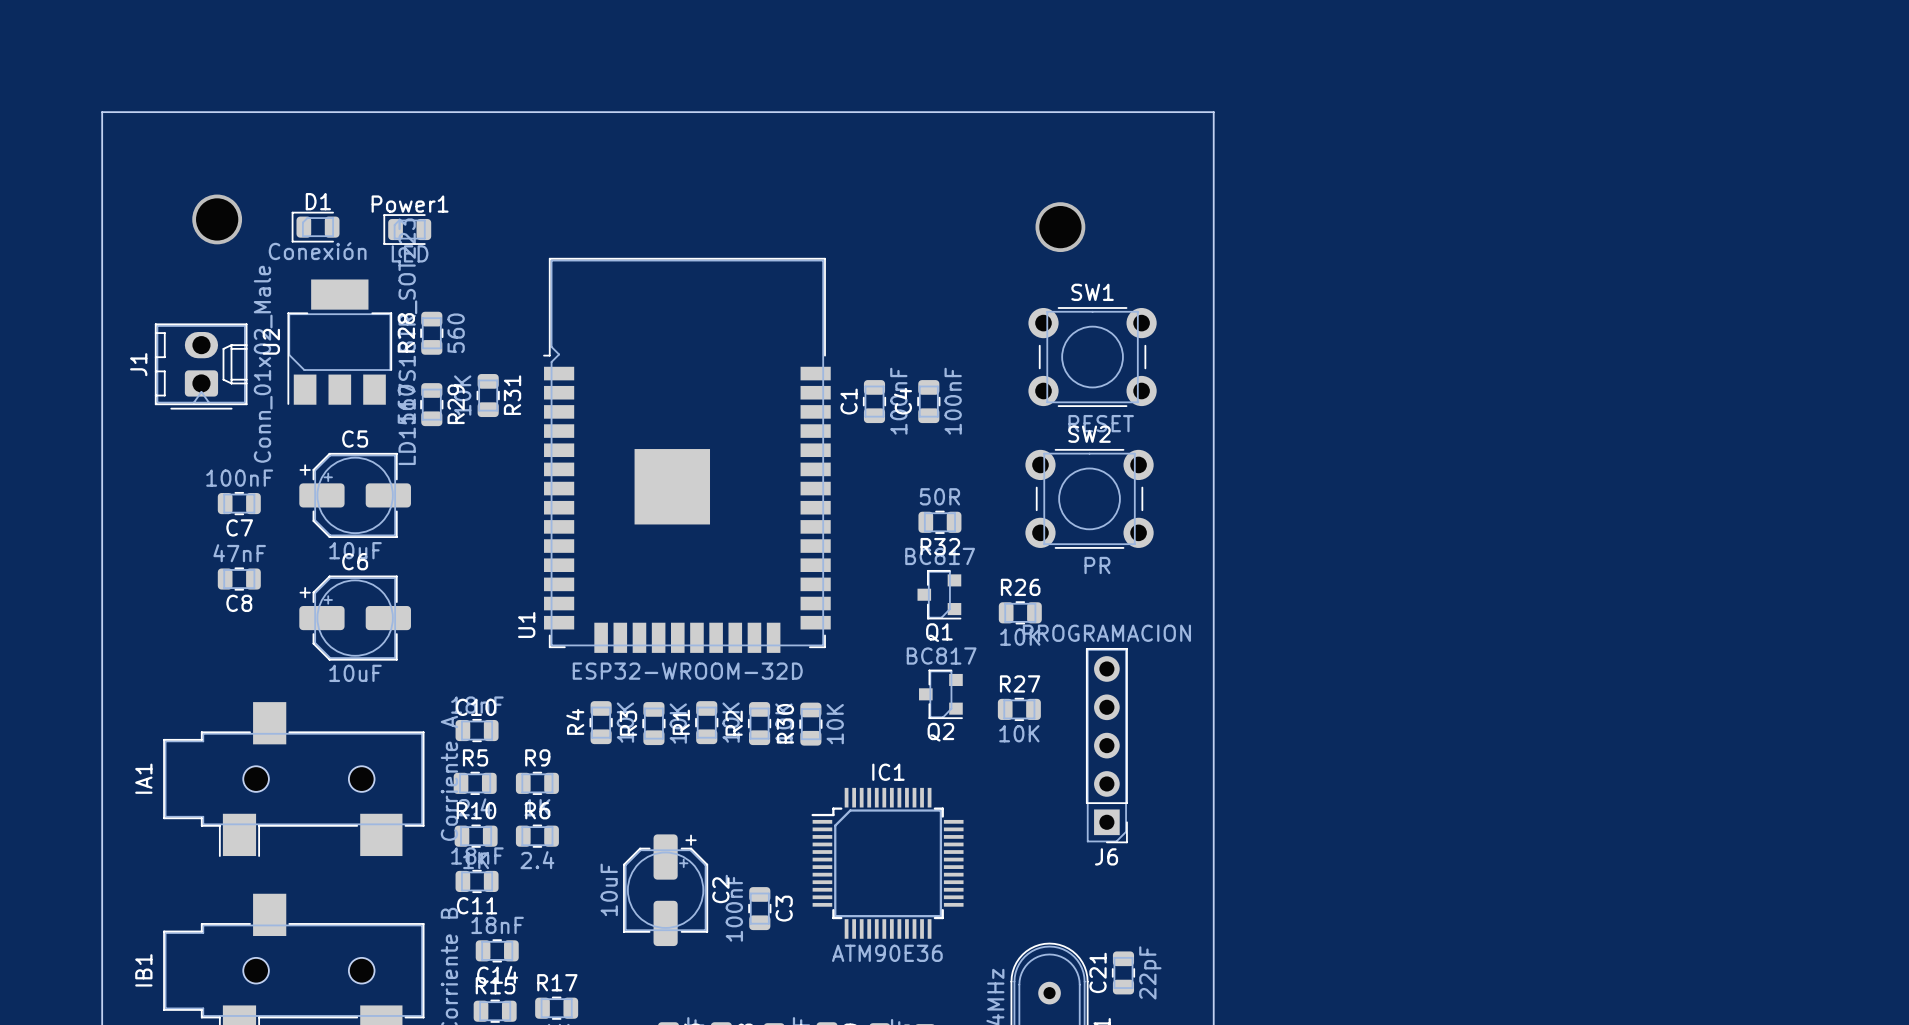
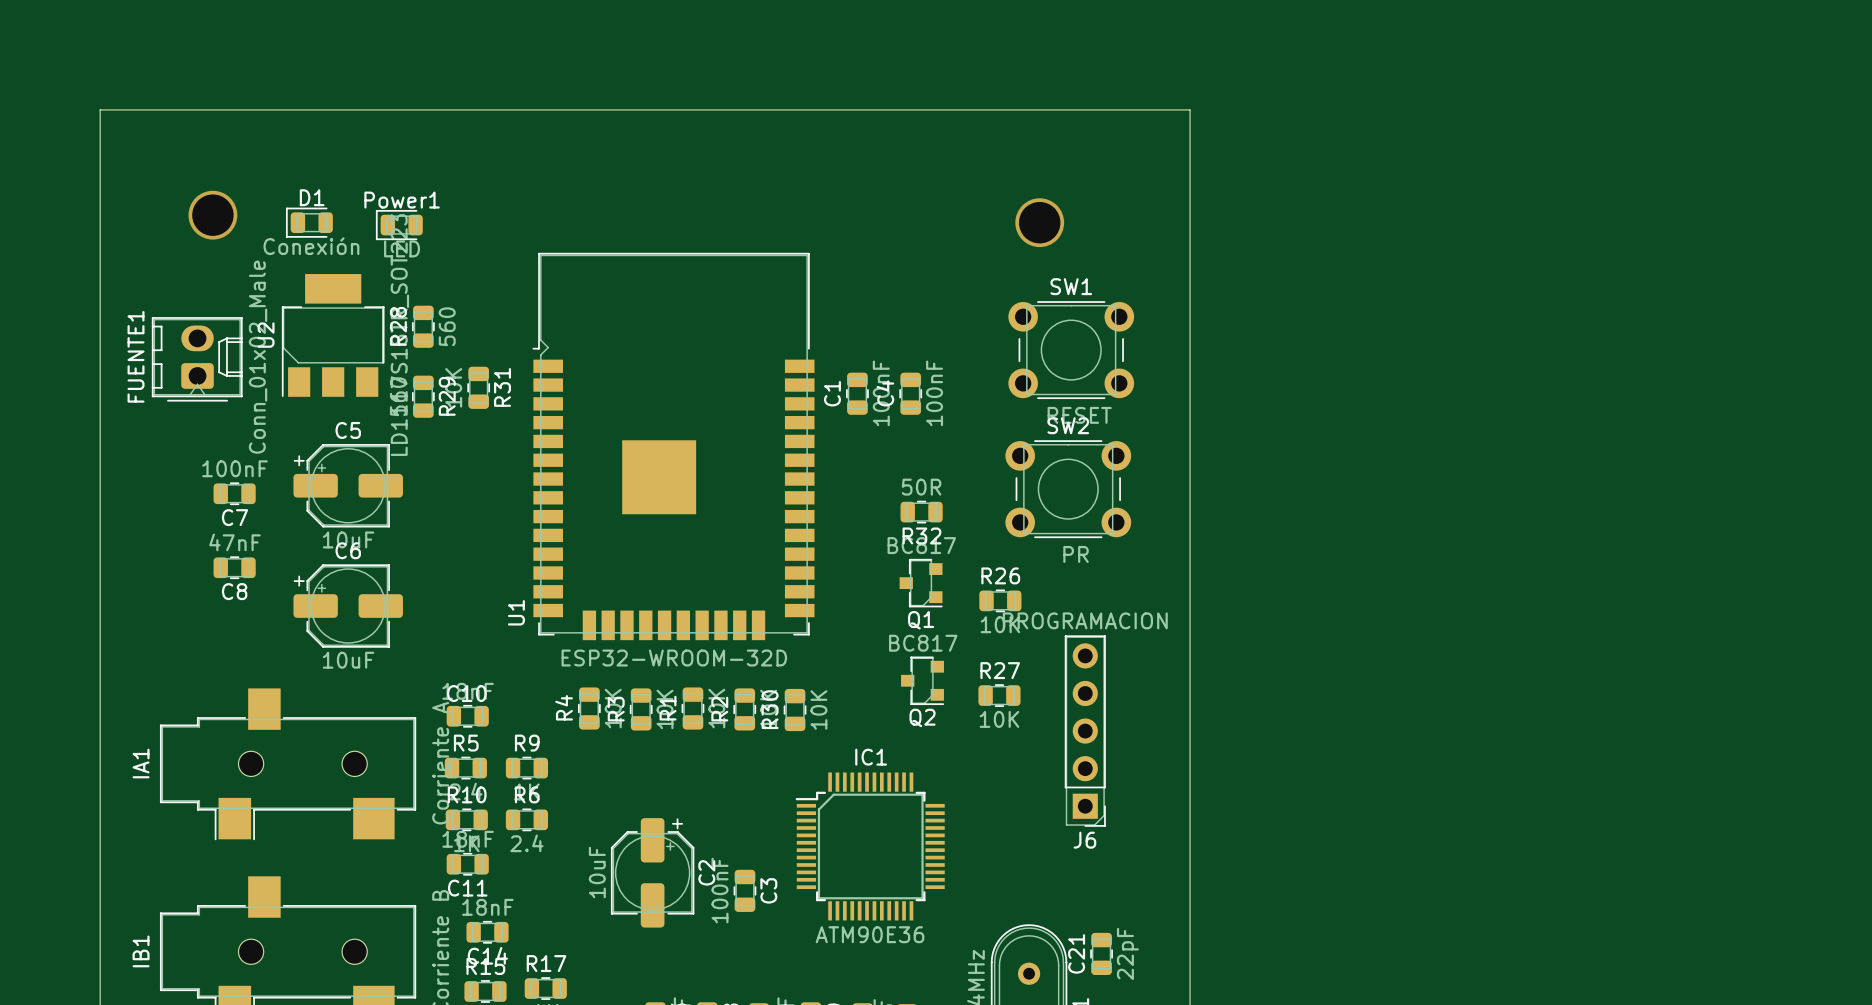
J1 name: J1 (138, 364) -> FUENTE1 (136, 356)

